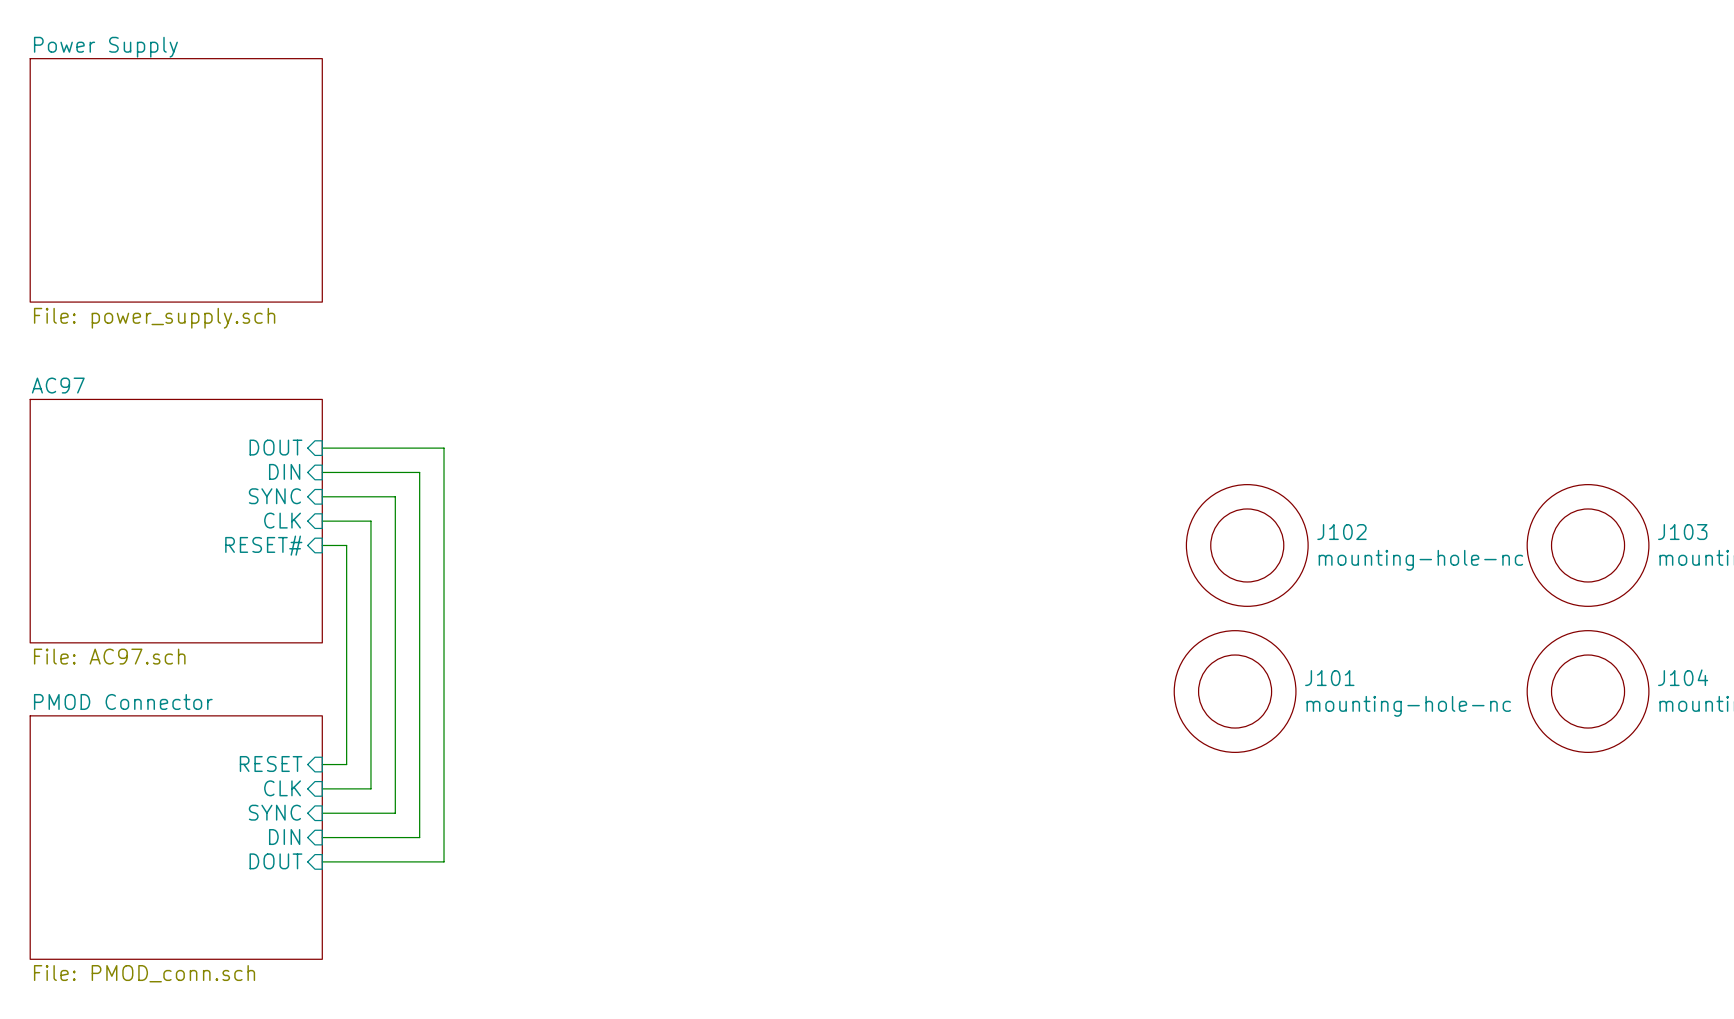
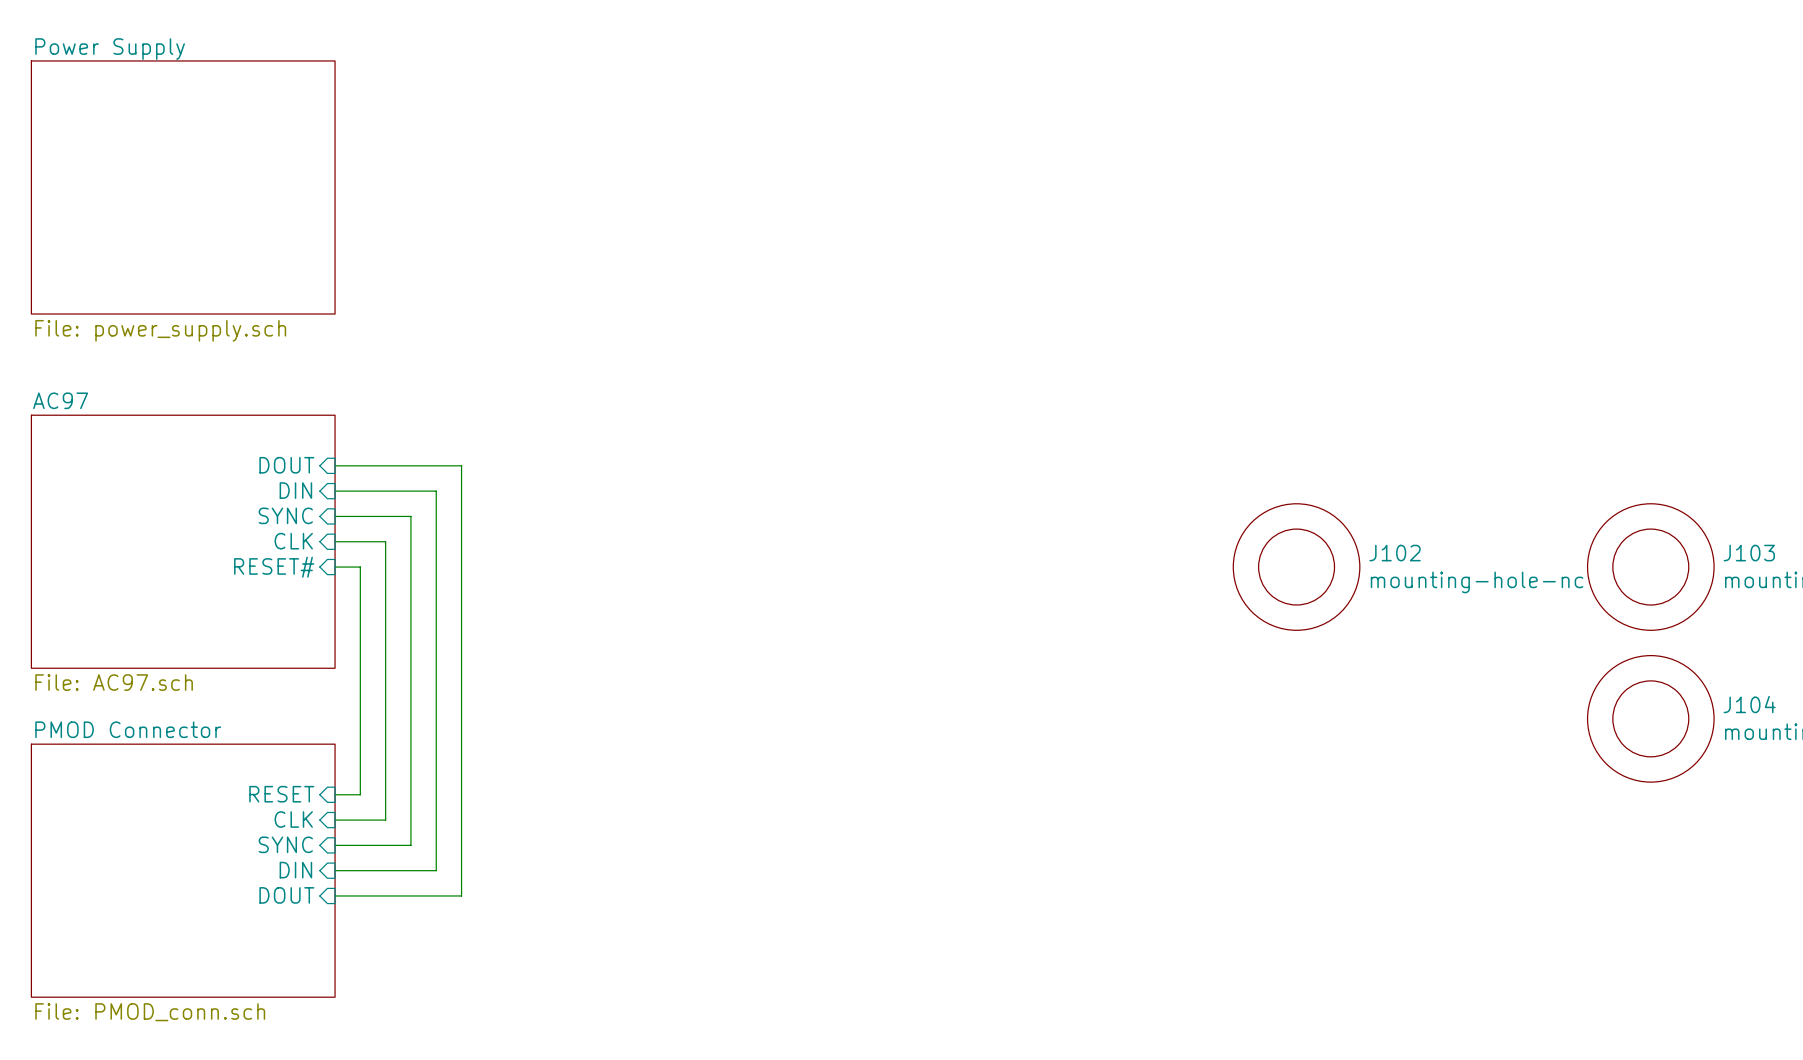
J101: mounting-hole-nc (1235, 691) -> none

